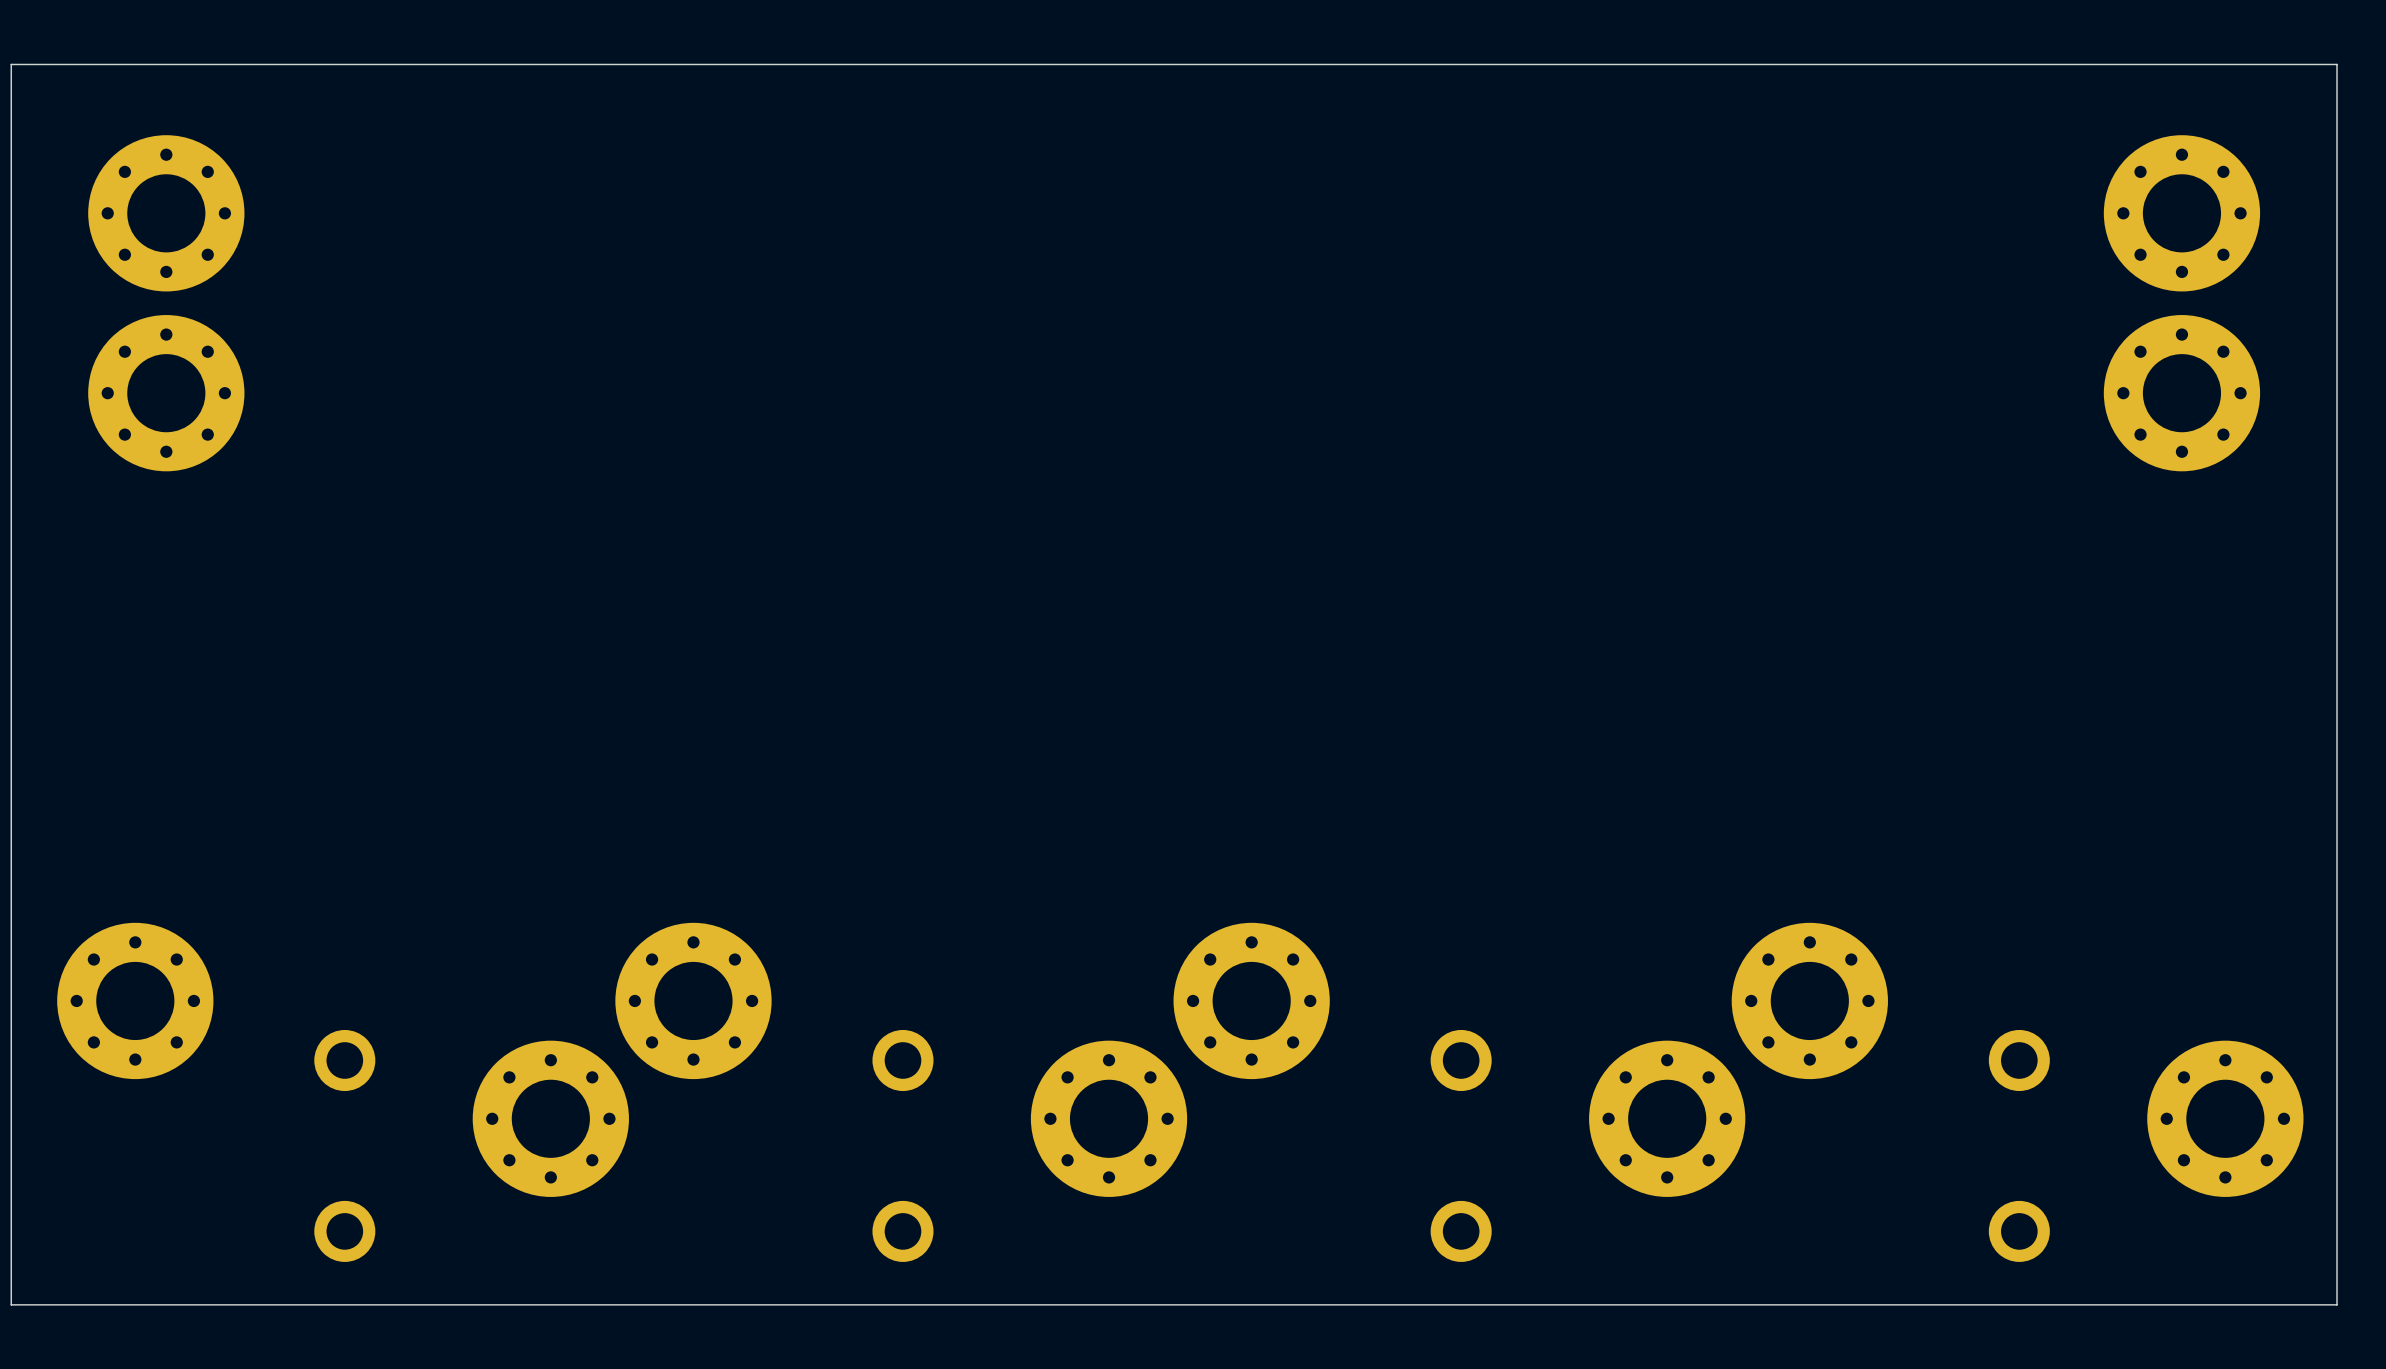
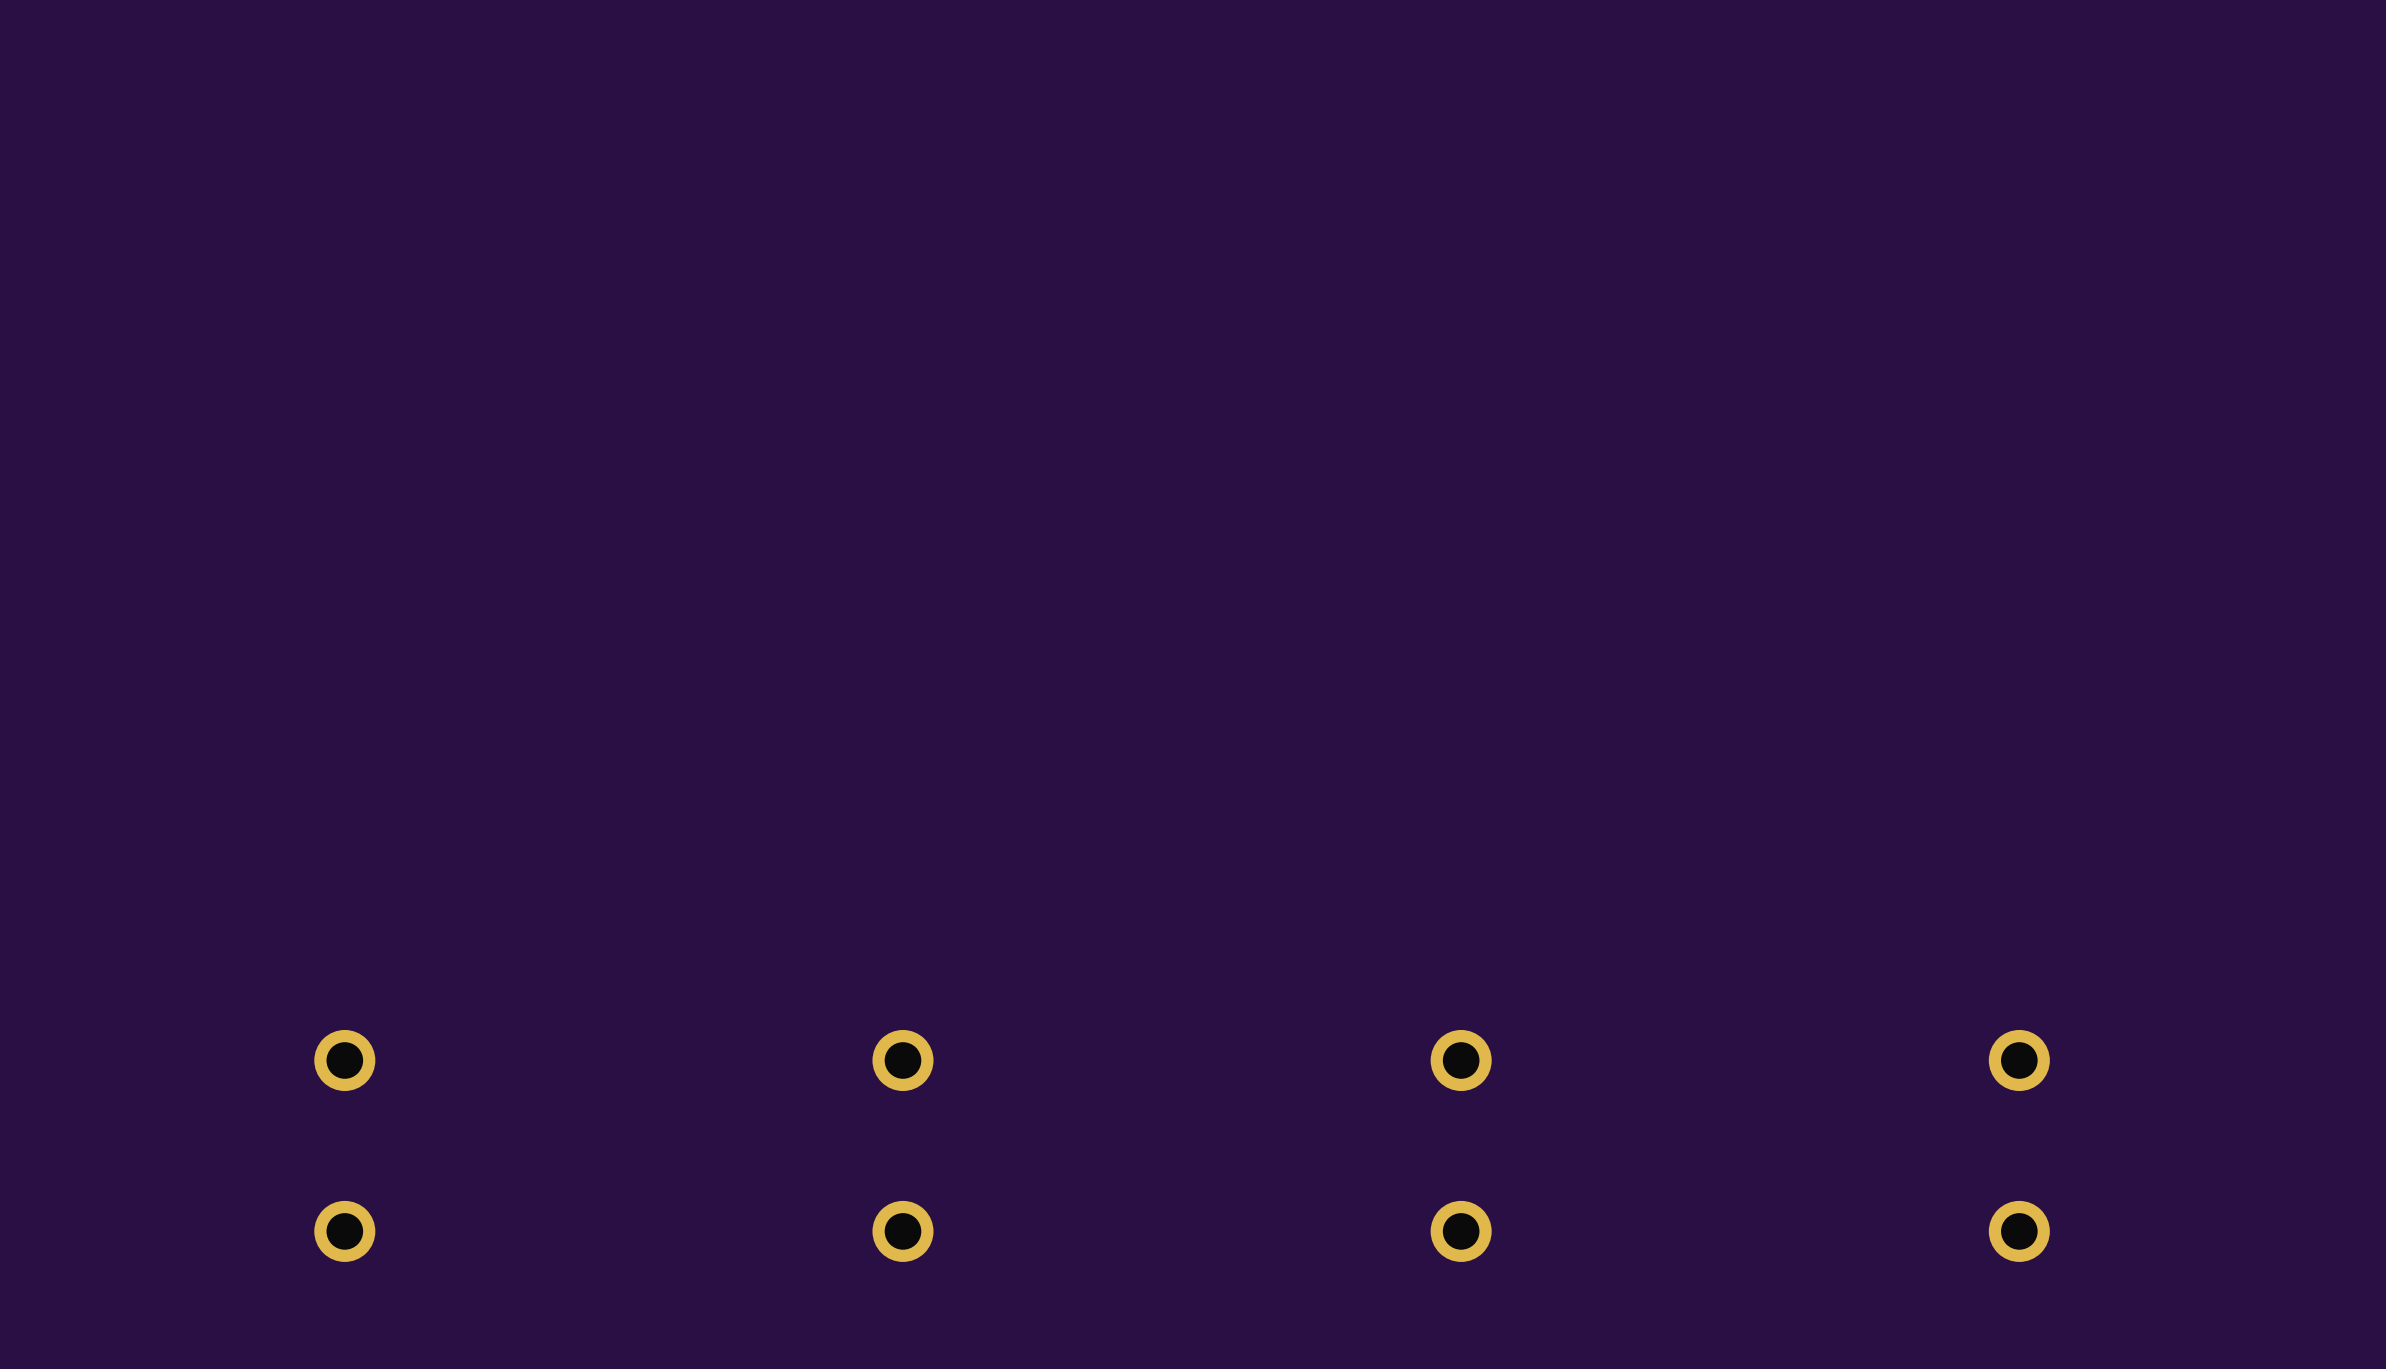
board edge: (2337, 64) (11, 64) (11, 1304) (2337, 1304) (2337, 64) -> none
part: (166, 213) -> none
part: (2181, 213) -> none
part: (166, 393) -> none
part: (2181, 393) -> none
part: (135, 1000) -> none
part: (693, 1000) -> none
part: (1251, 1000) -> none
part: (1809, 1000) -> none
part: (550, 1118) -> none
part: (1109, 1118) -> none
part: (1667, 1118) -> none
part: (2225, 1118) -> none

